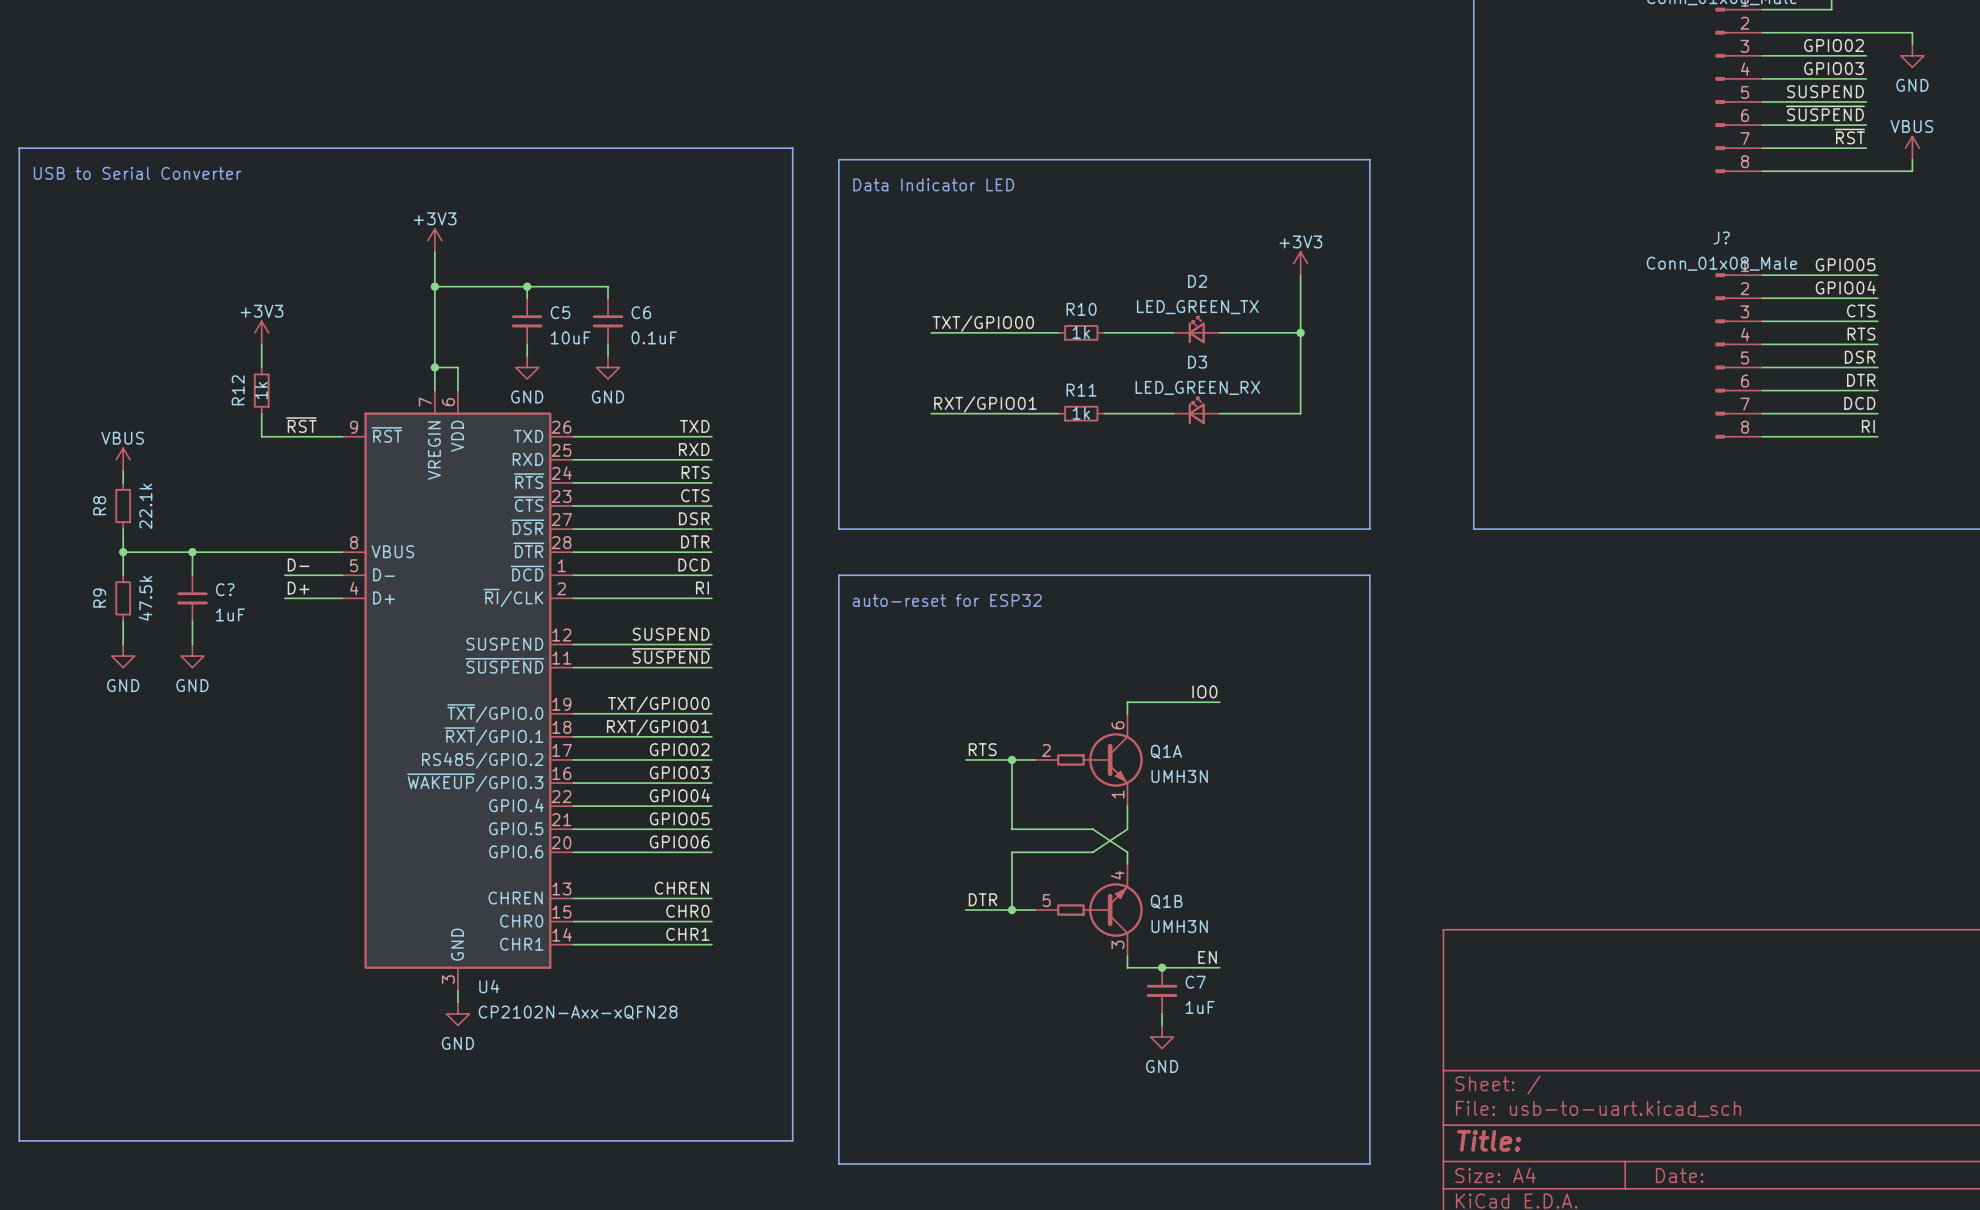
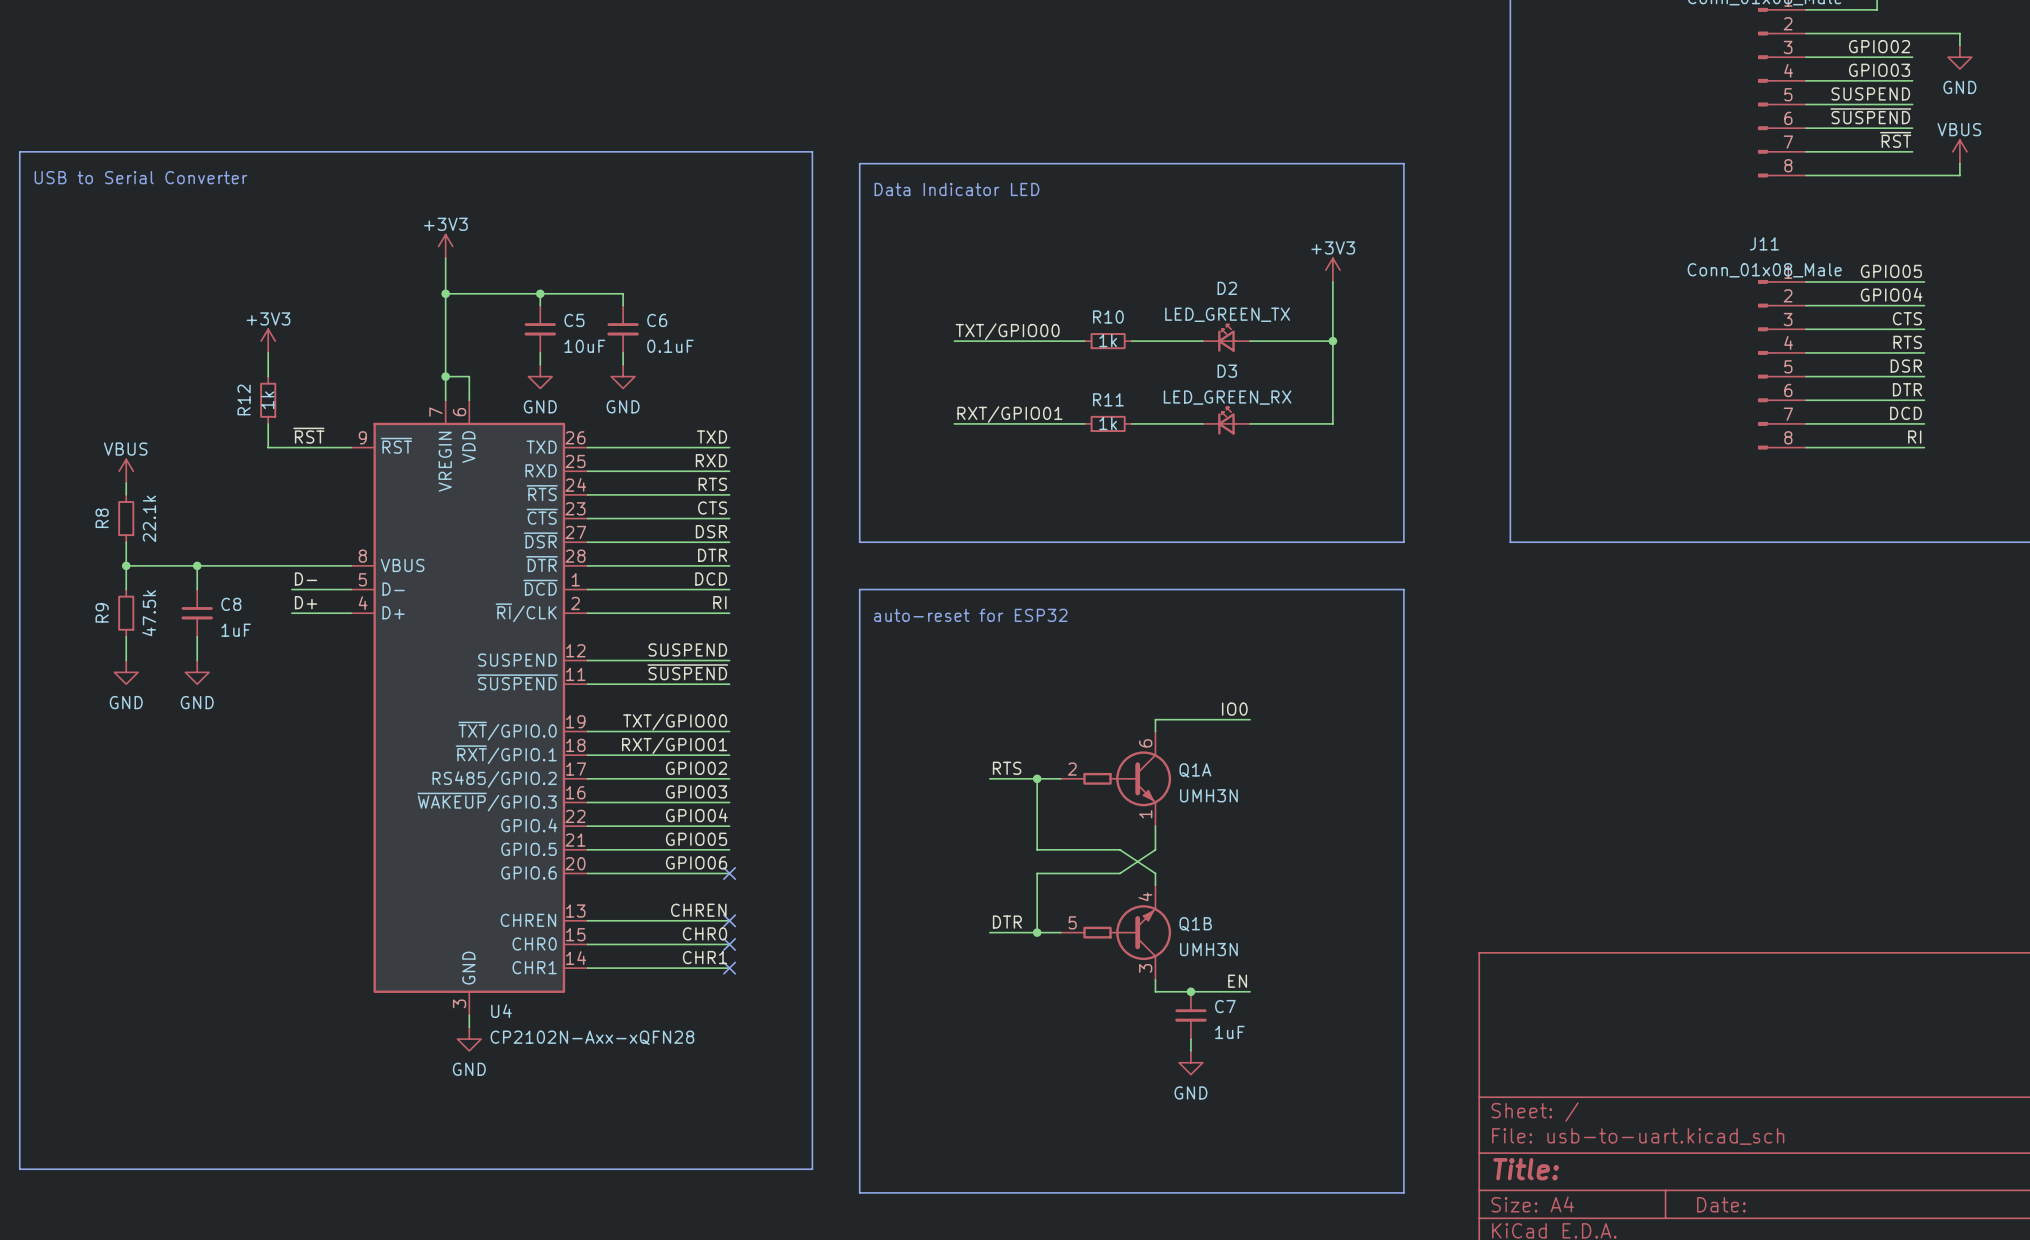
J? name: J? (1721, 237) -> J11 (1764, 243)
C? name: C? (225, 589) -> C8 (231, 604)
no-connect mark: none -> (729, 873)
no-connect mark: none -> (729, 920)
no-connect mark: none -> (729, 944)
no-connect mark: none -> (729, 968)

